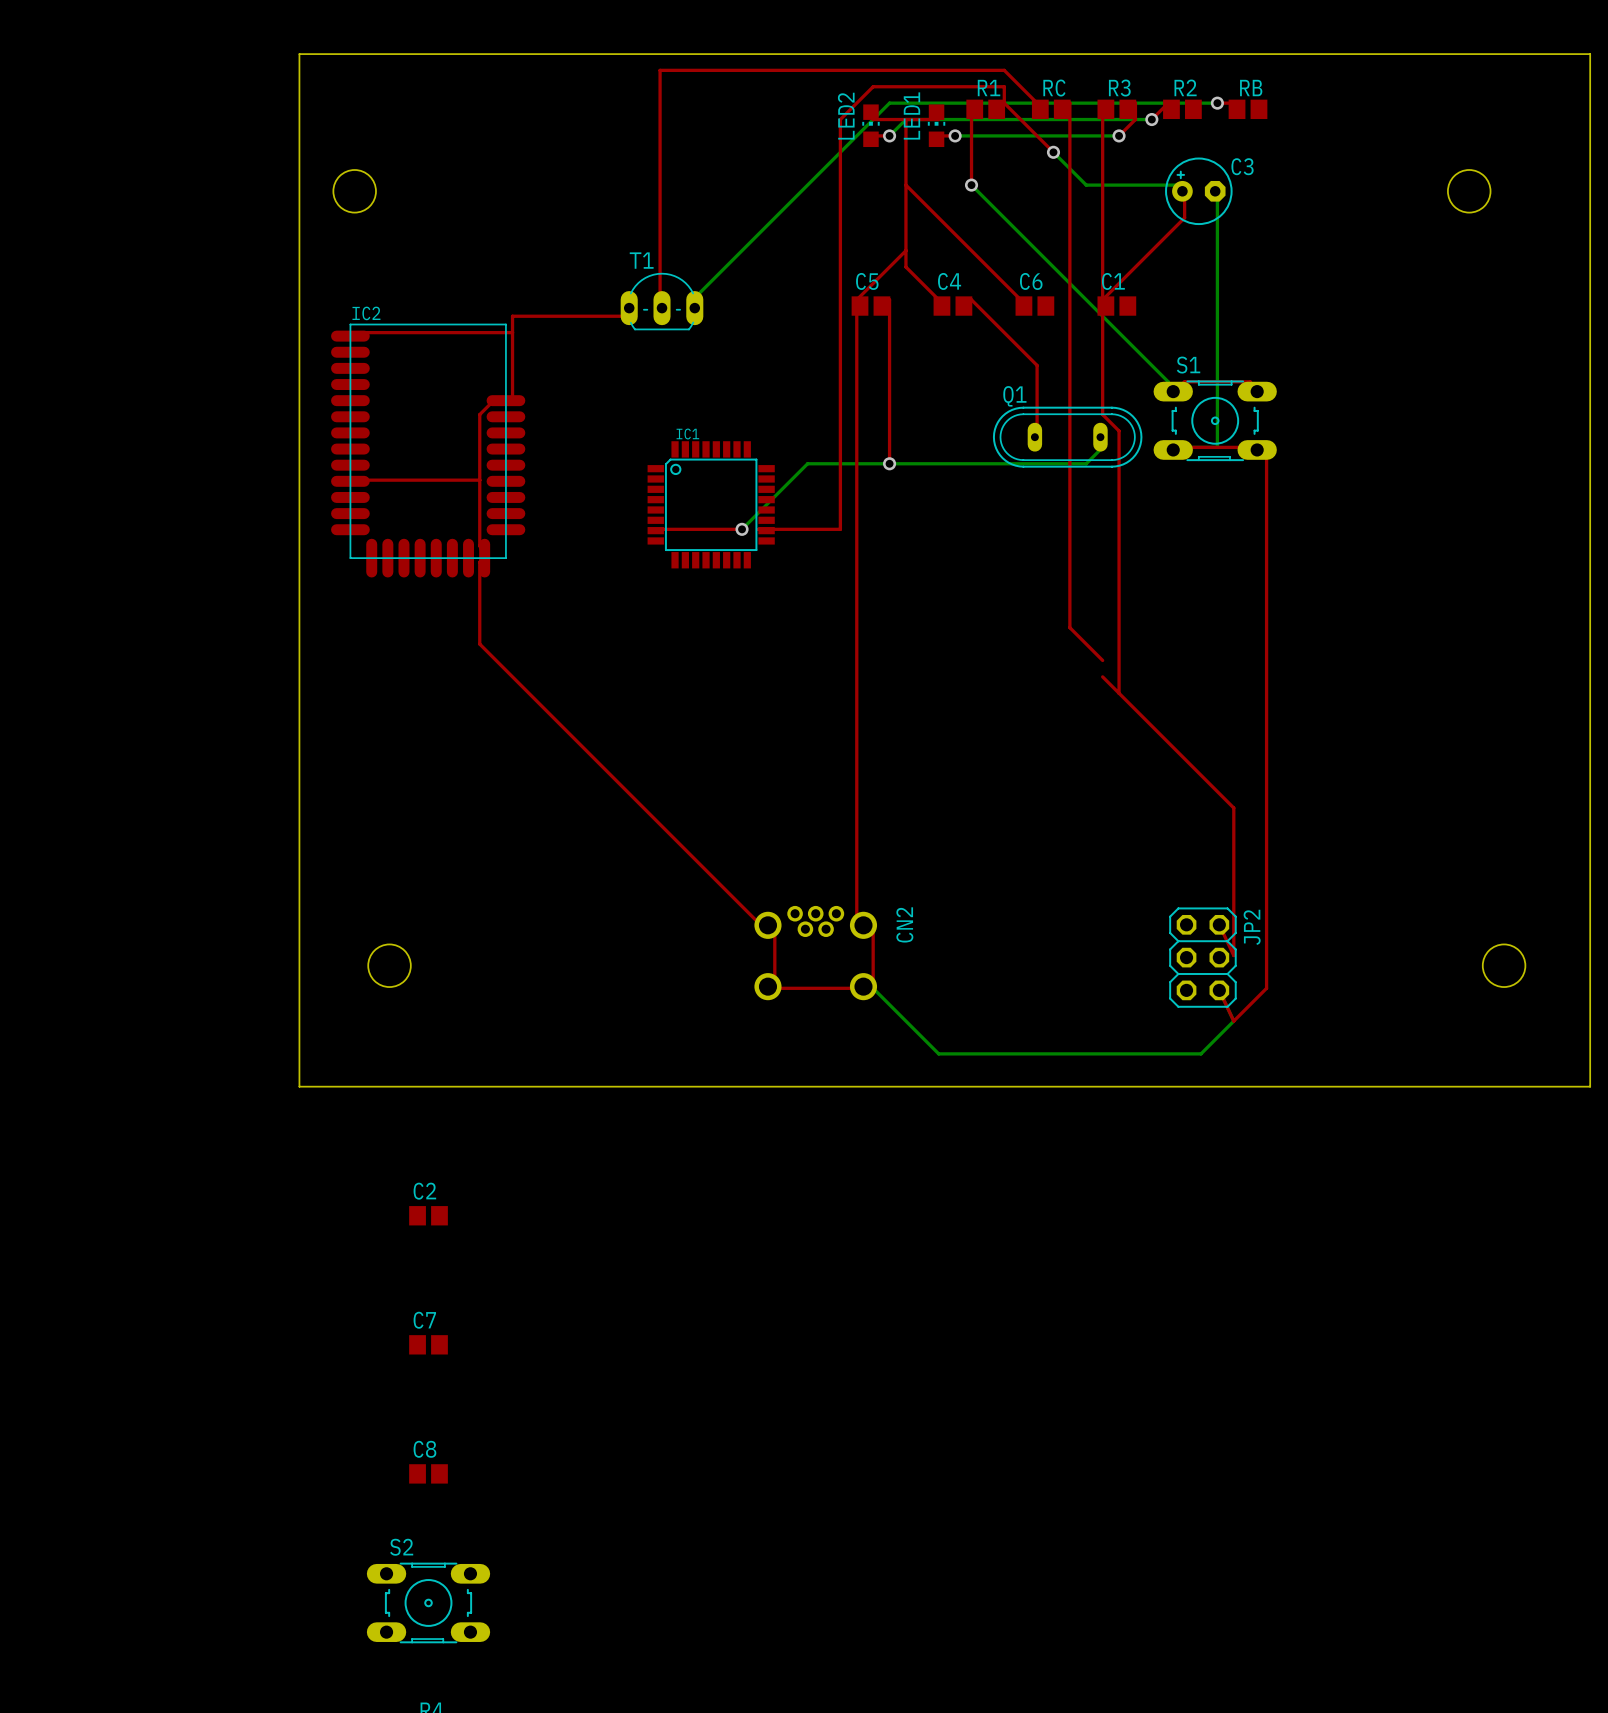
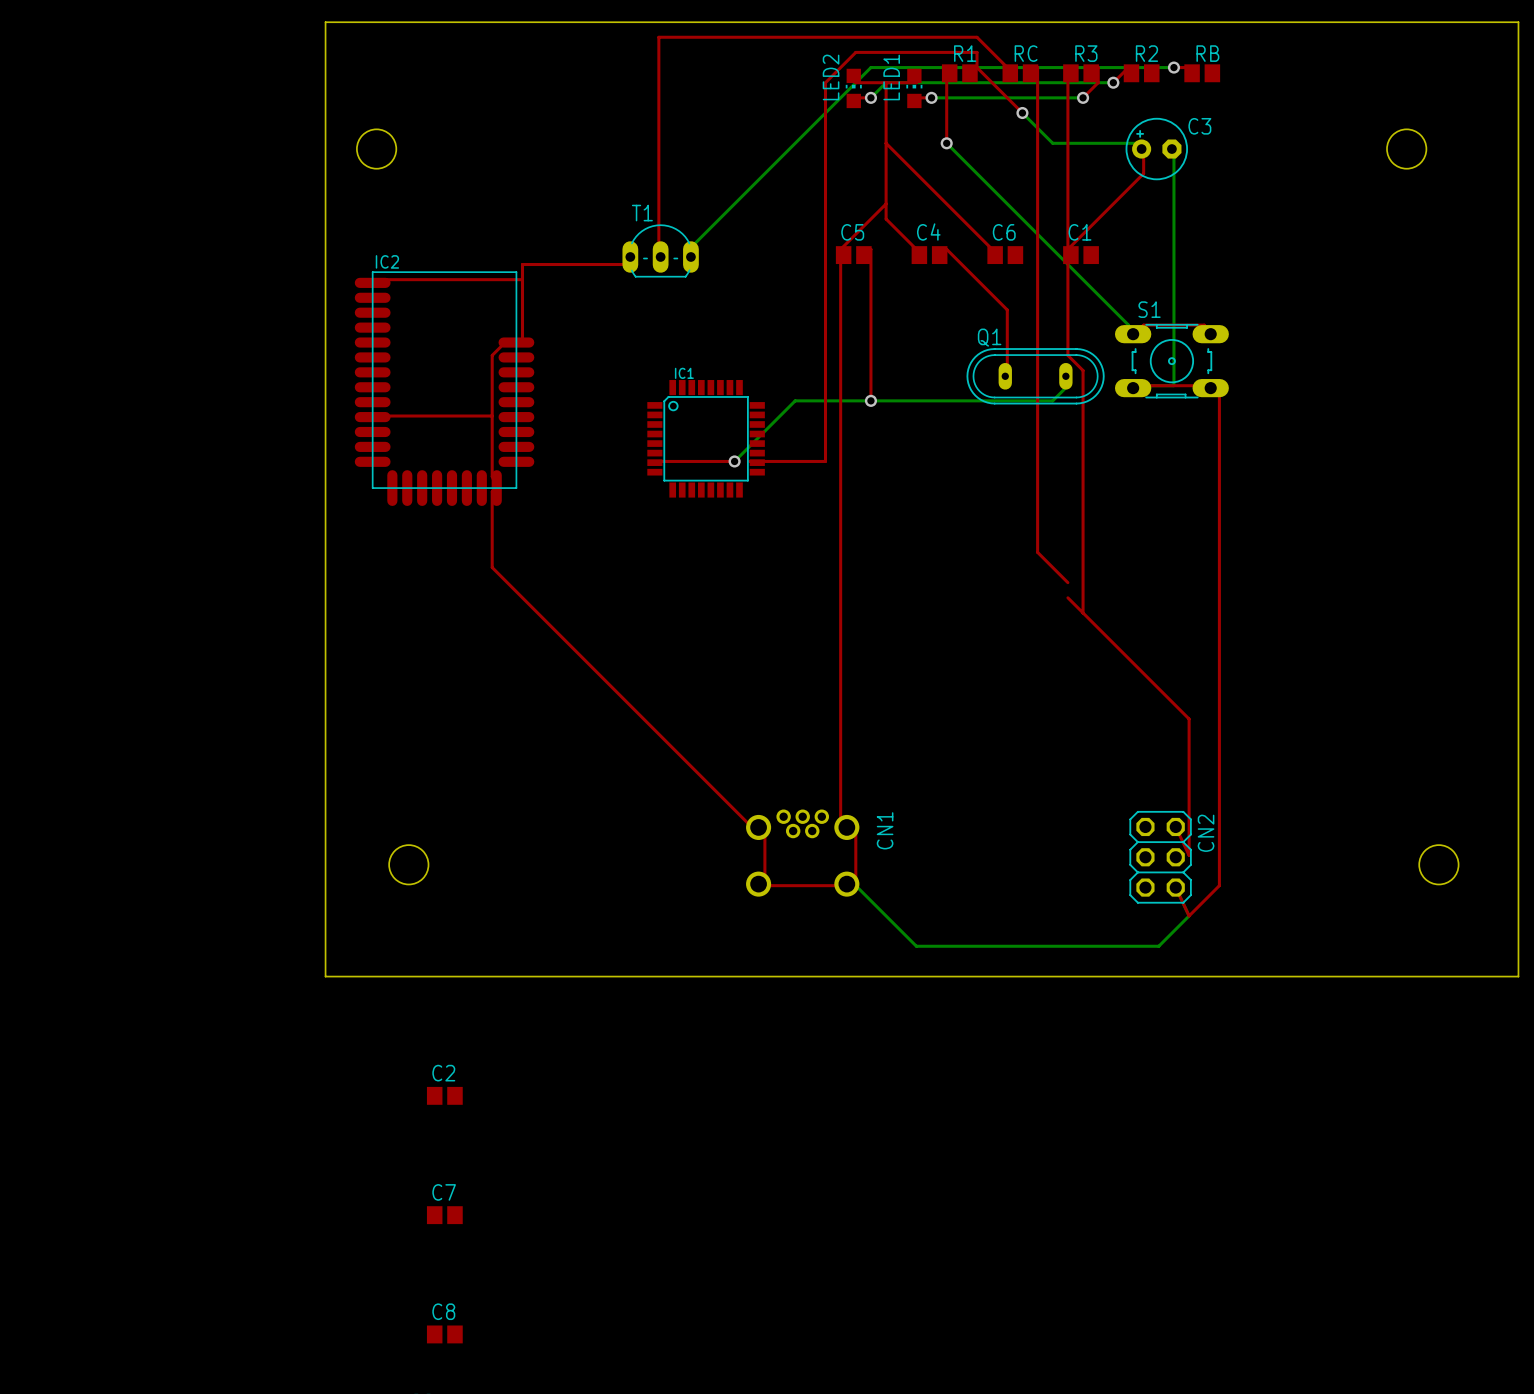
CN2 name: CN2 (904, 924) -> CN1 (885, 830)
JP2 name: JP2 (1252, 927) -> CN2 (1206, 833)

